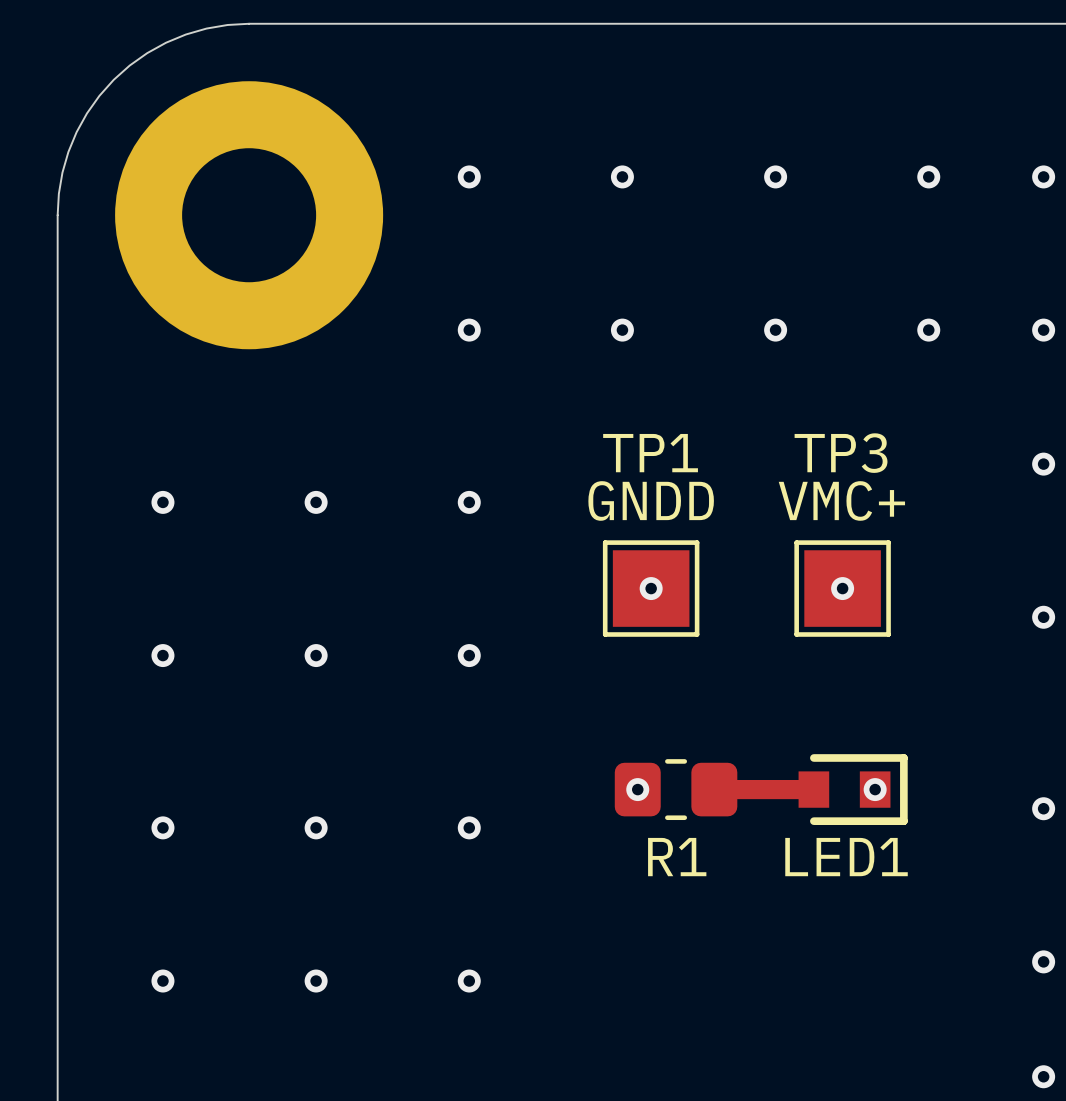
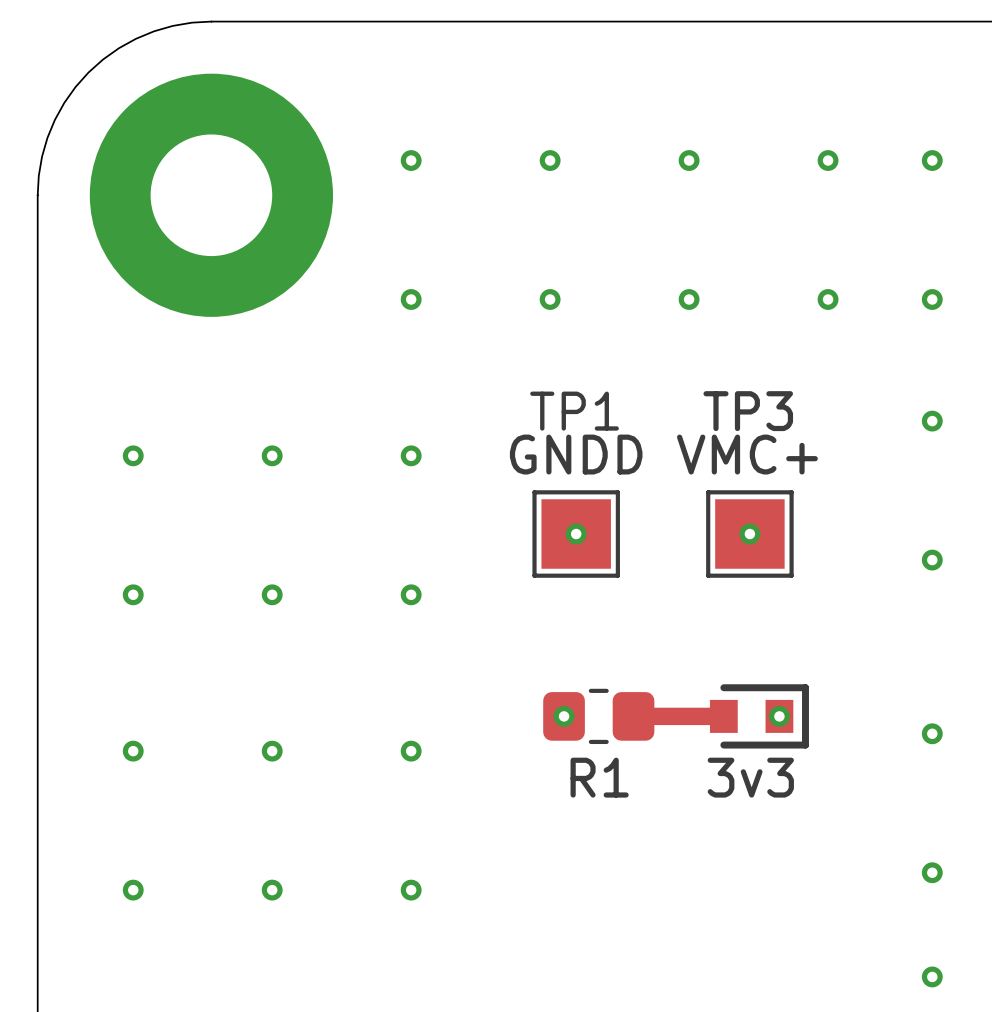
LED1 name: LED1 (846, 857) -> 3v3 (750, 777)

